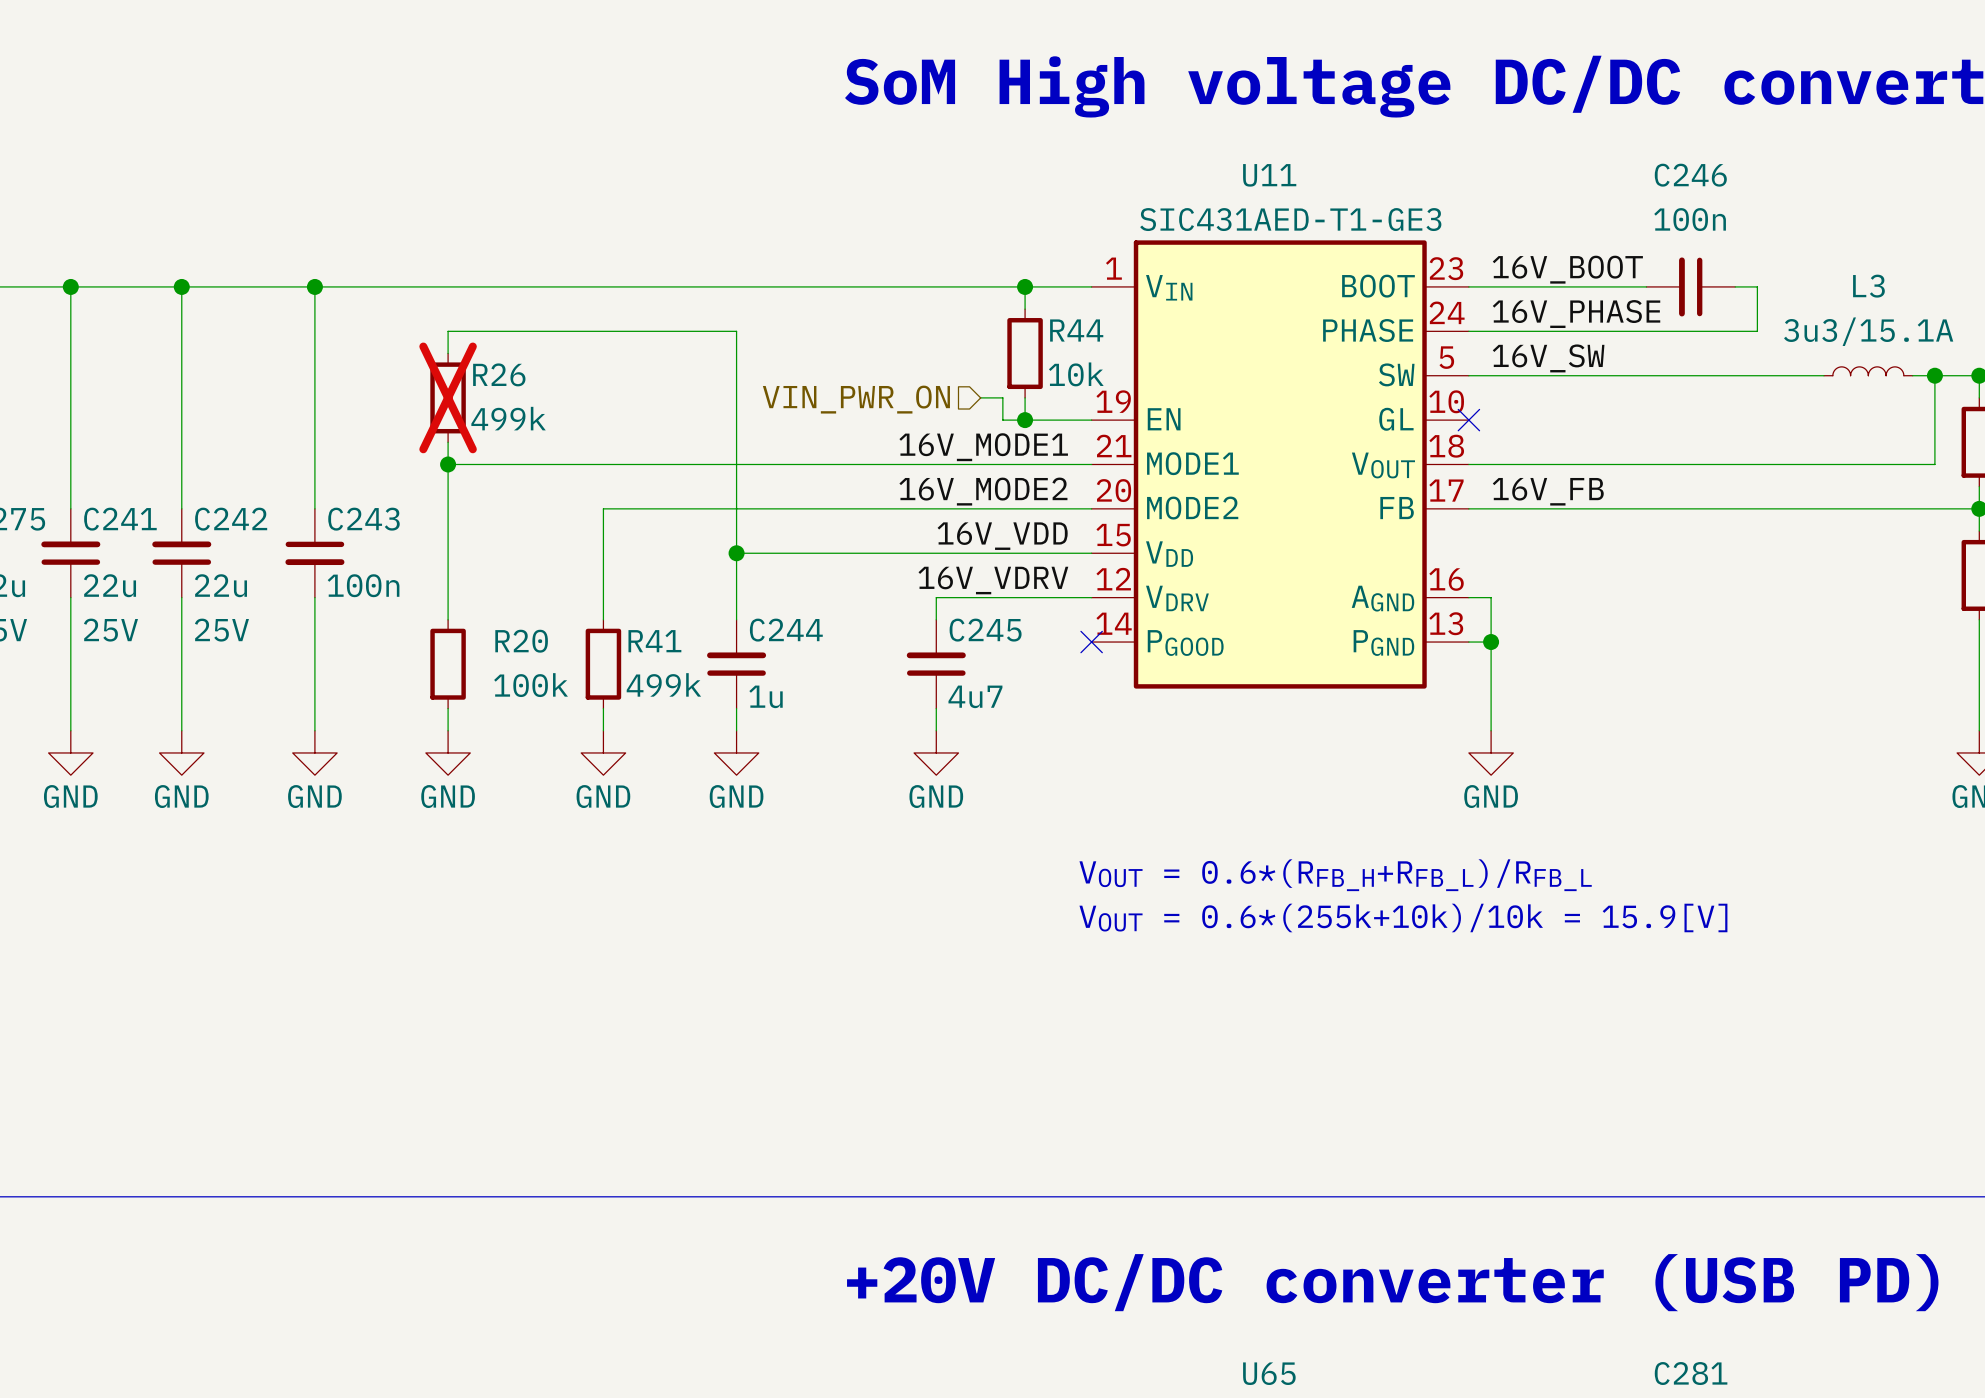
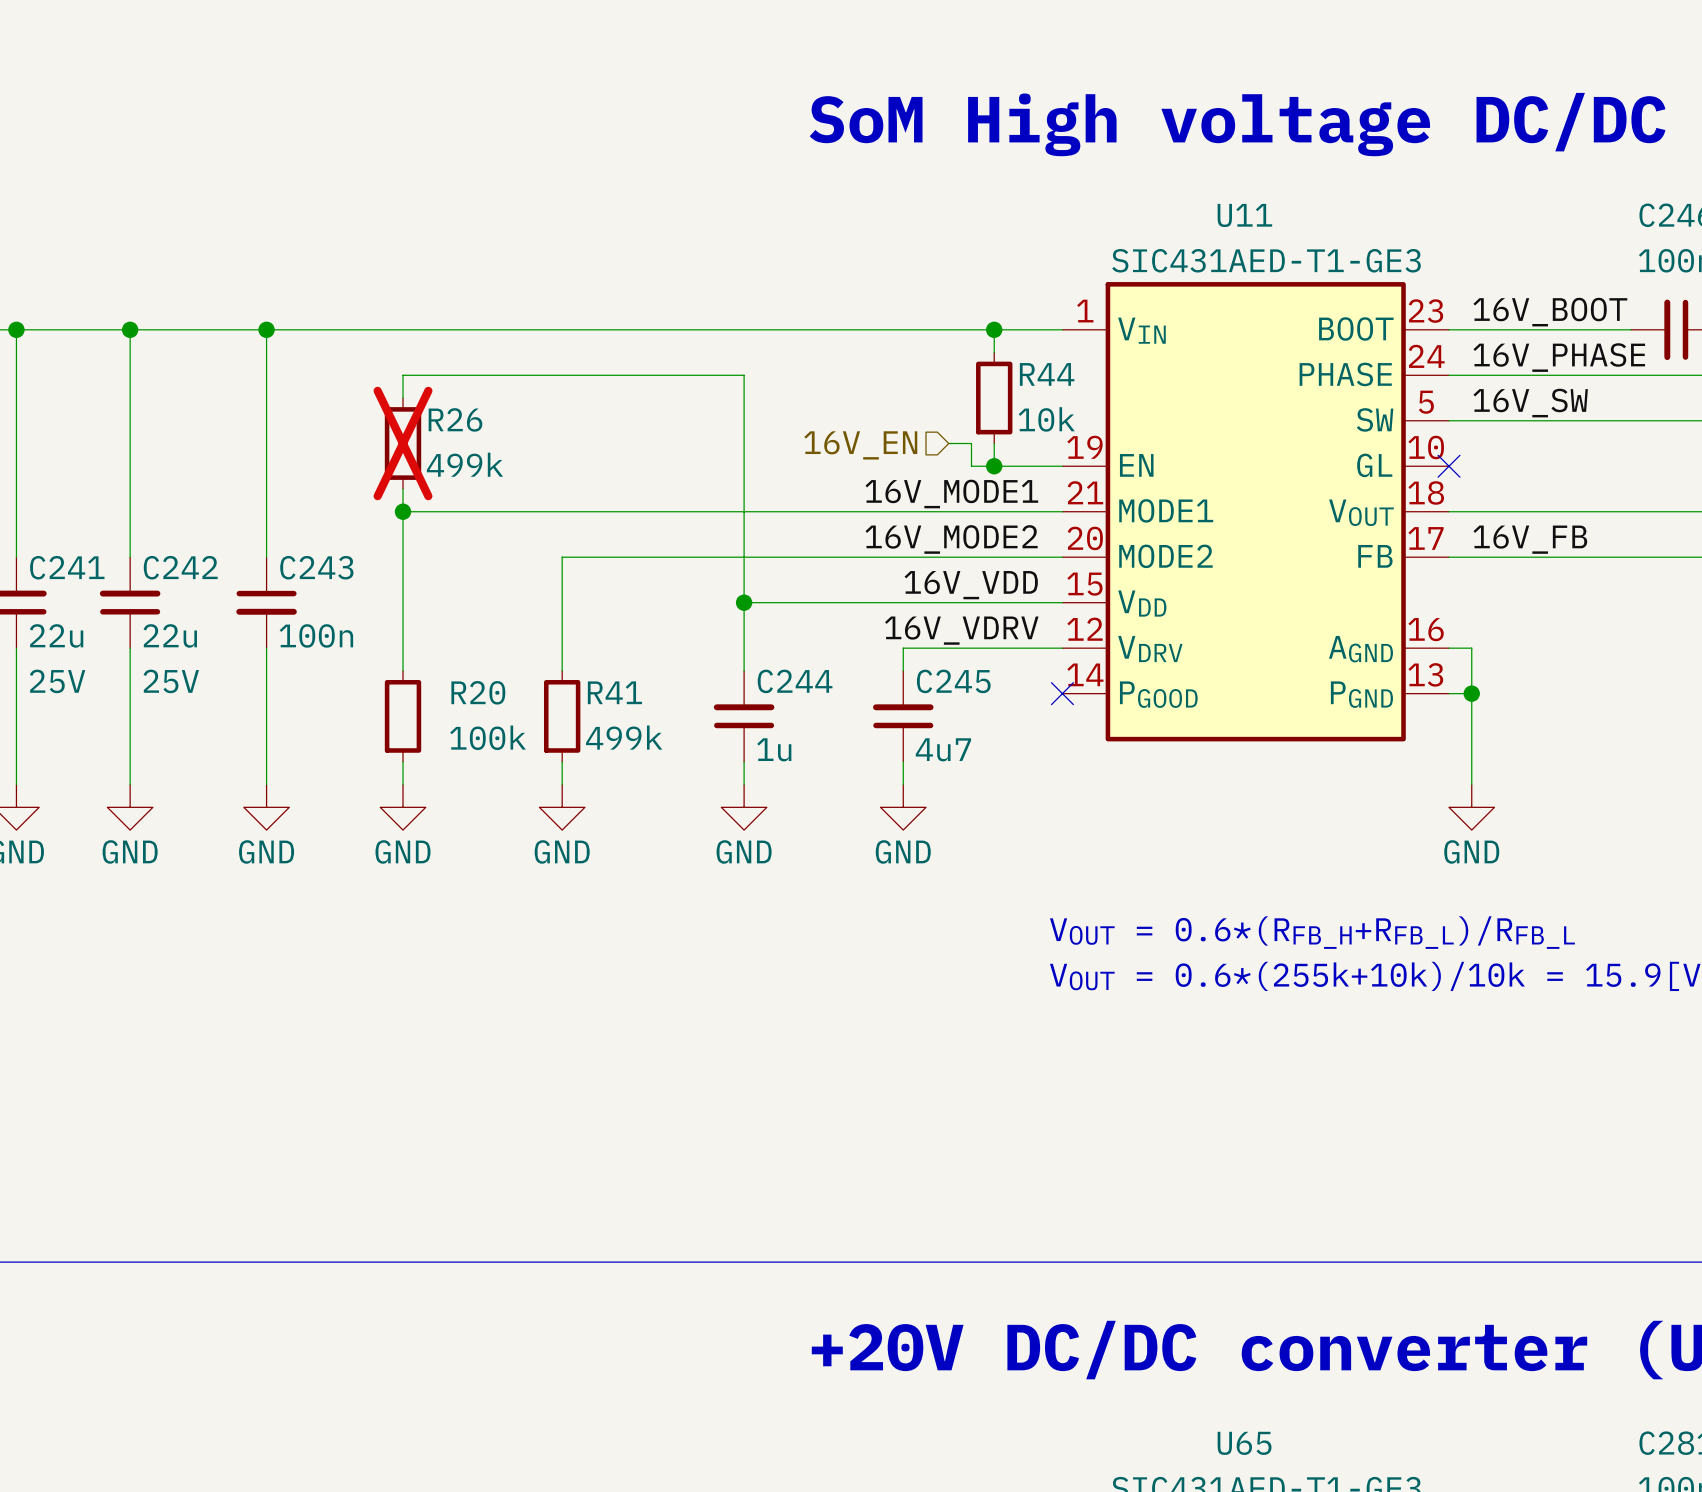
wire: (736, 331) (736, 619) -> (698, 375) (744, 375) (744, 670)
hierarchical label: VIN_PWR_ON (856, 399) -> 16V_EN (860, 445)
wire: (736, 553) (780, 553) -> none
junction position: (736, 553) -> (744, 602)
C244 position: (736, 664) -> (744, 716)
wire: (736, 708) (736, 730) -> (744, 761) (744, 784)
power symbol position: GND (736, 752) -> GND (744, 807)

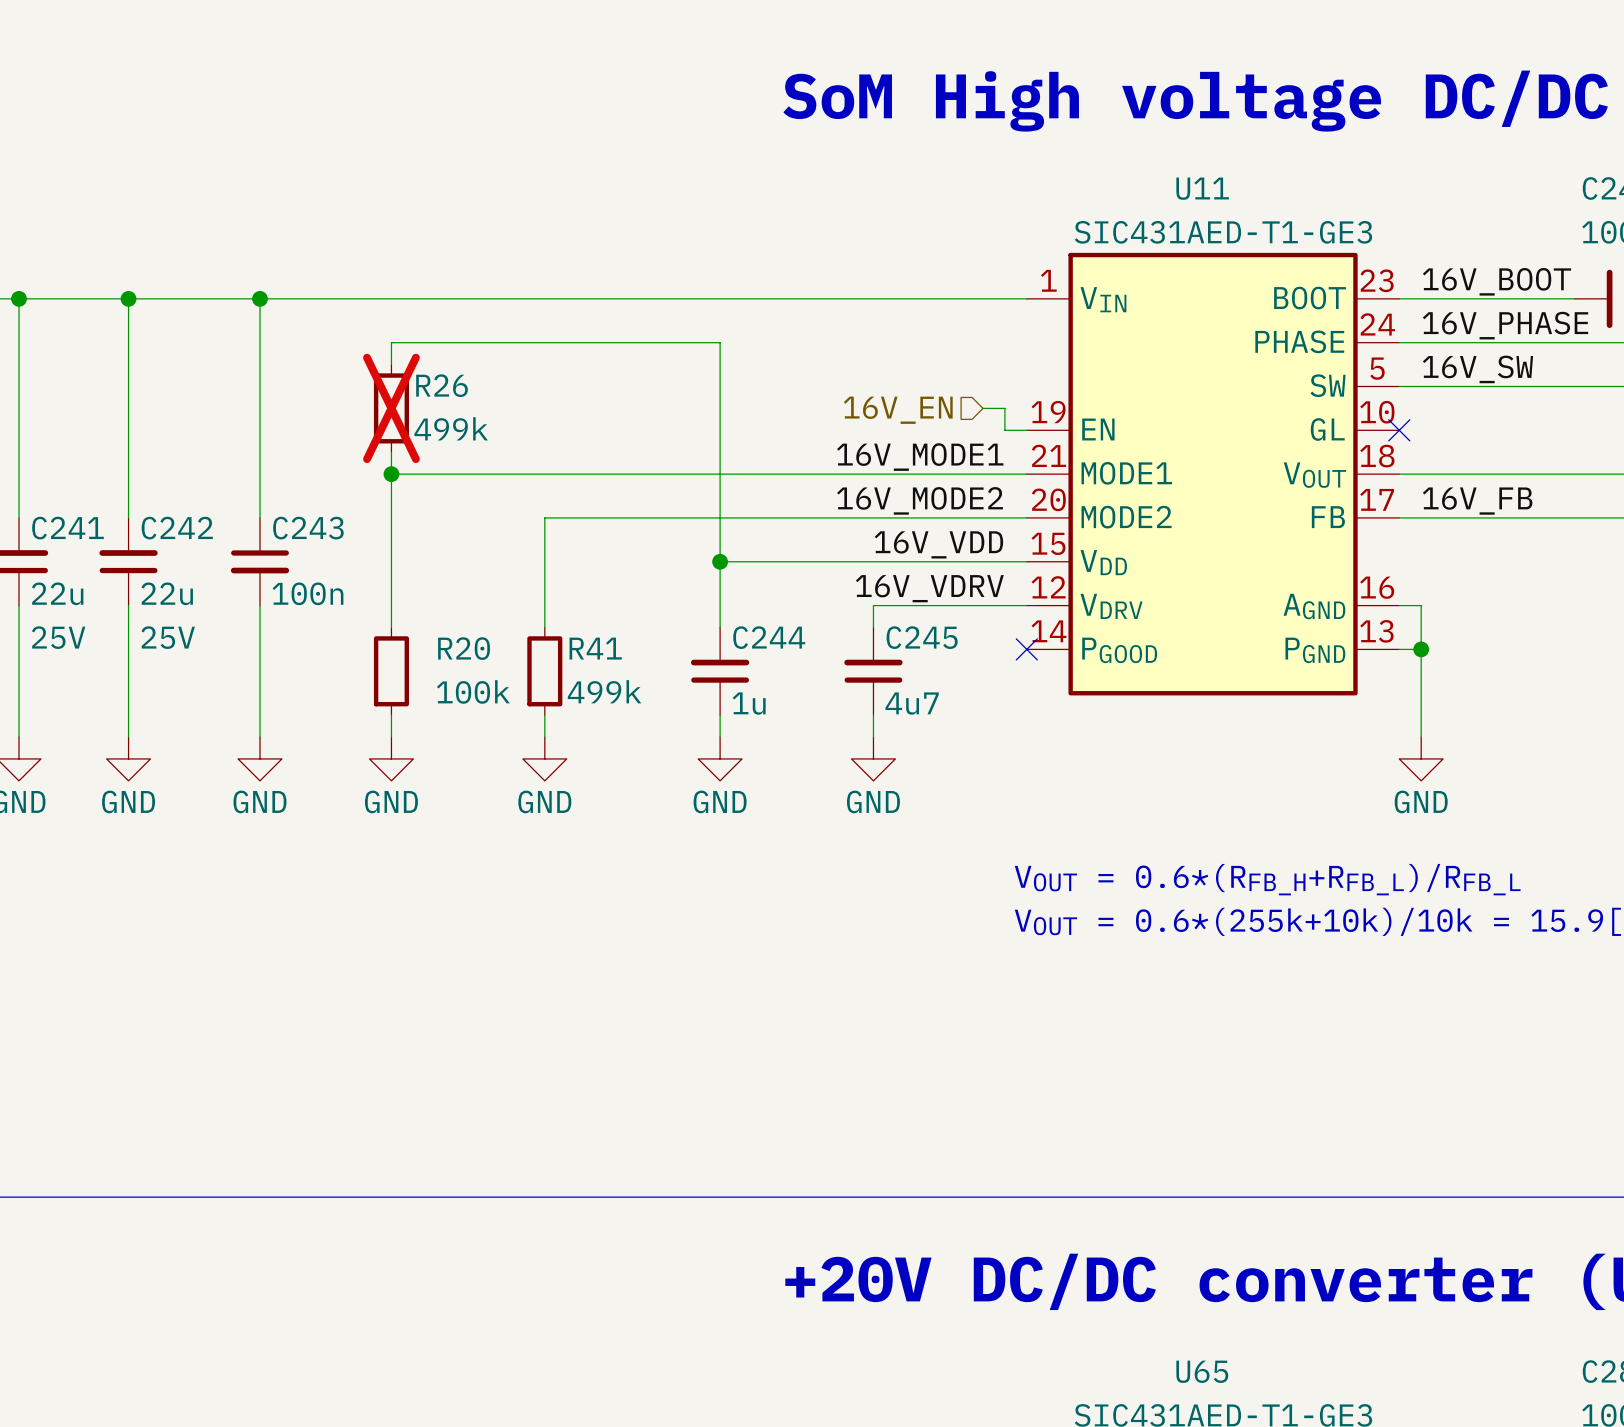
wire: (994, 329) (994, 352) -> none
junction: (994, 329) -> none
R44: (994, 398) -> none
wire: (948, 443) (971, 443) (971, 466) (1039, 466) -> (983, 408) (1004, 408) (1004, 430)
hierarchical label position: 16V_EN (860, 445) -> 16V_EN (898, 410)
junction: (994, 466) -> none

